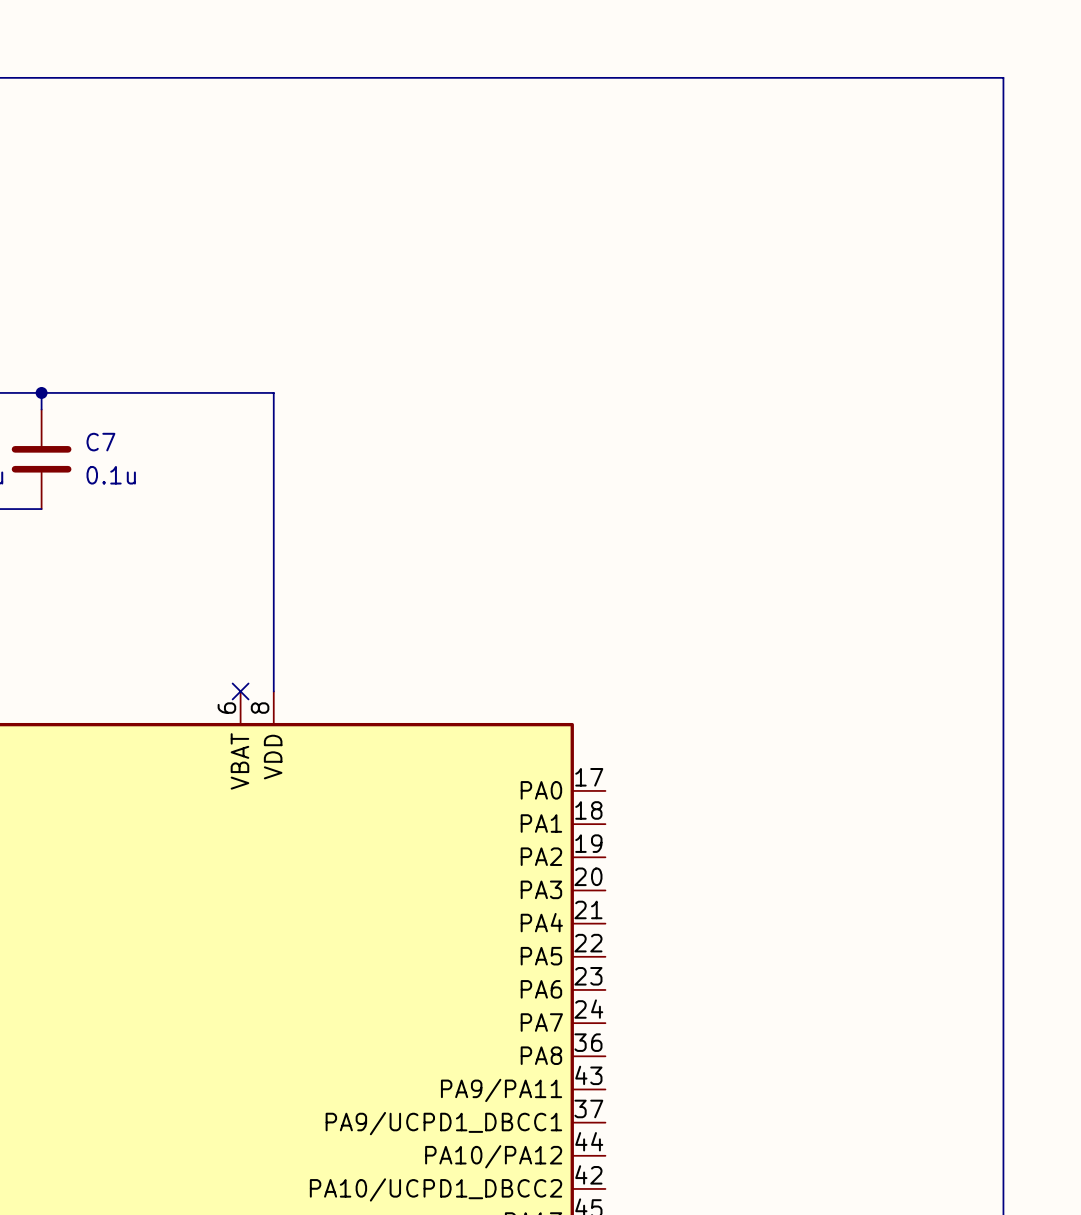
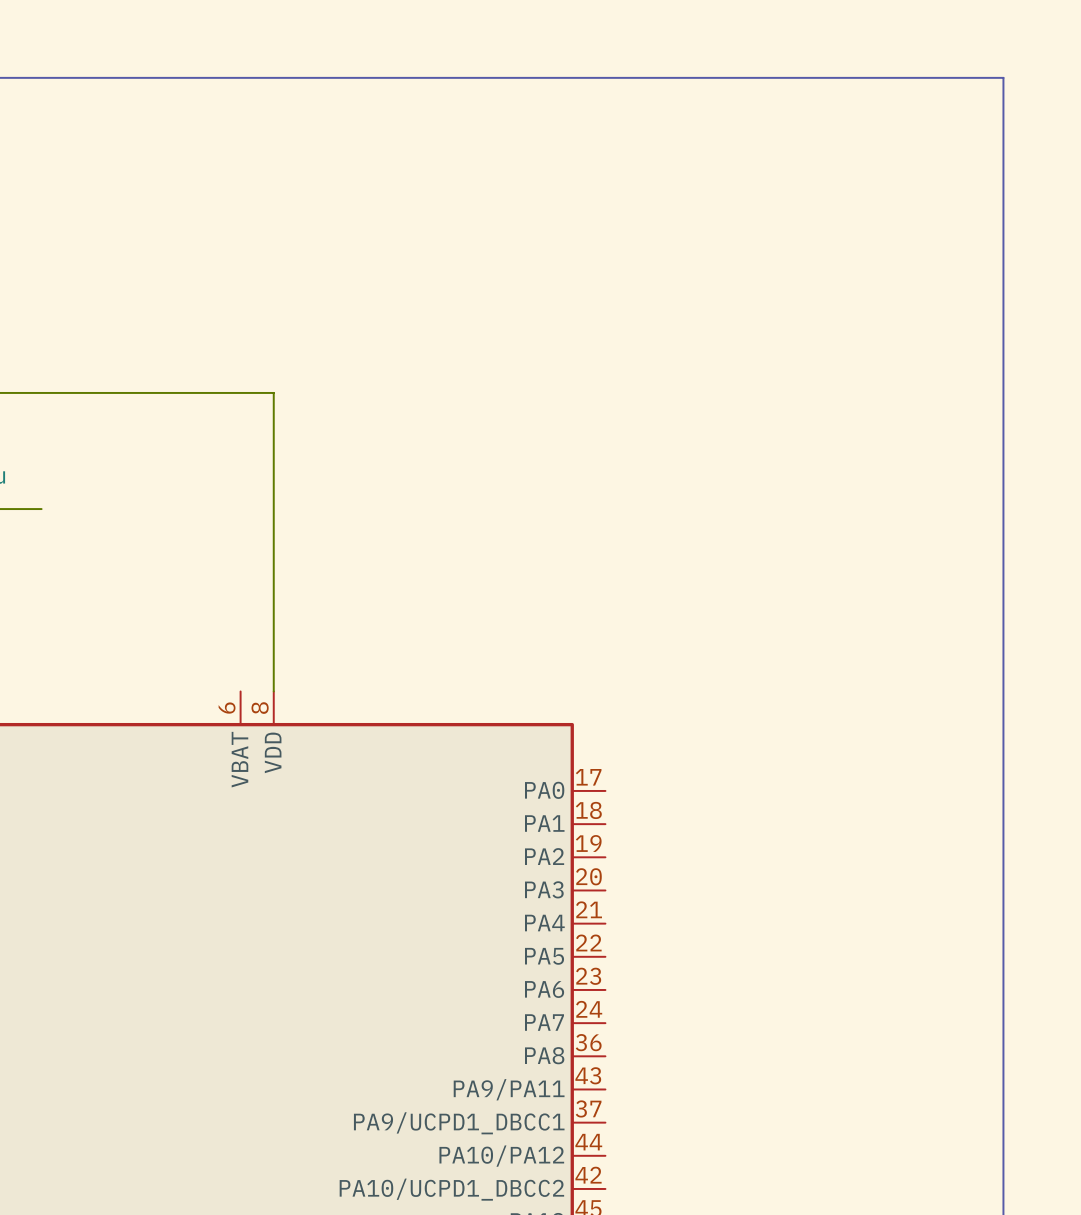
wire: (41, 392) (41, 409) -> none
junction: (41, 392) -> none
C7: 0.1u (41, 459) -> none
no-connect mark: (240, 691) -> none

